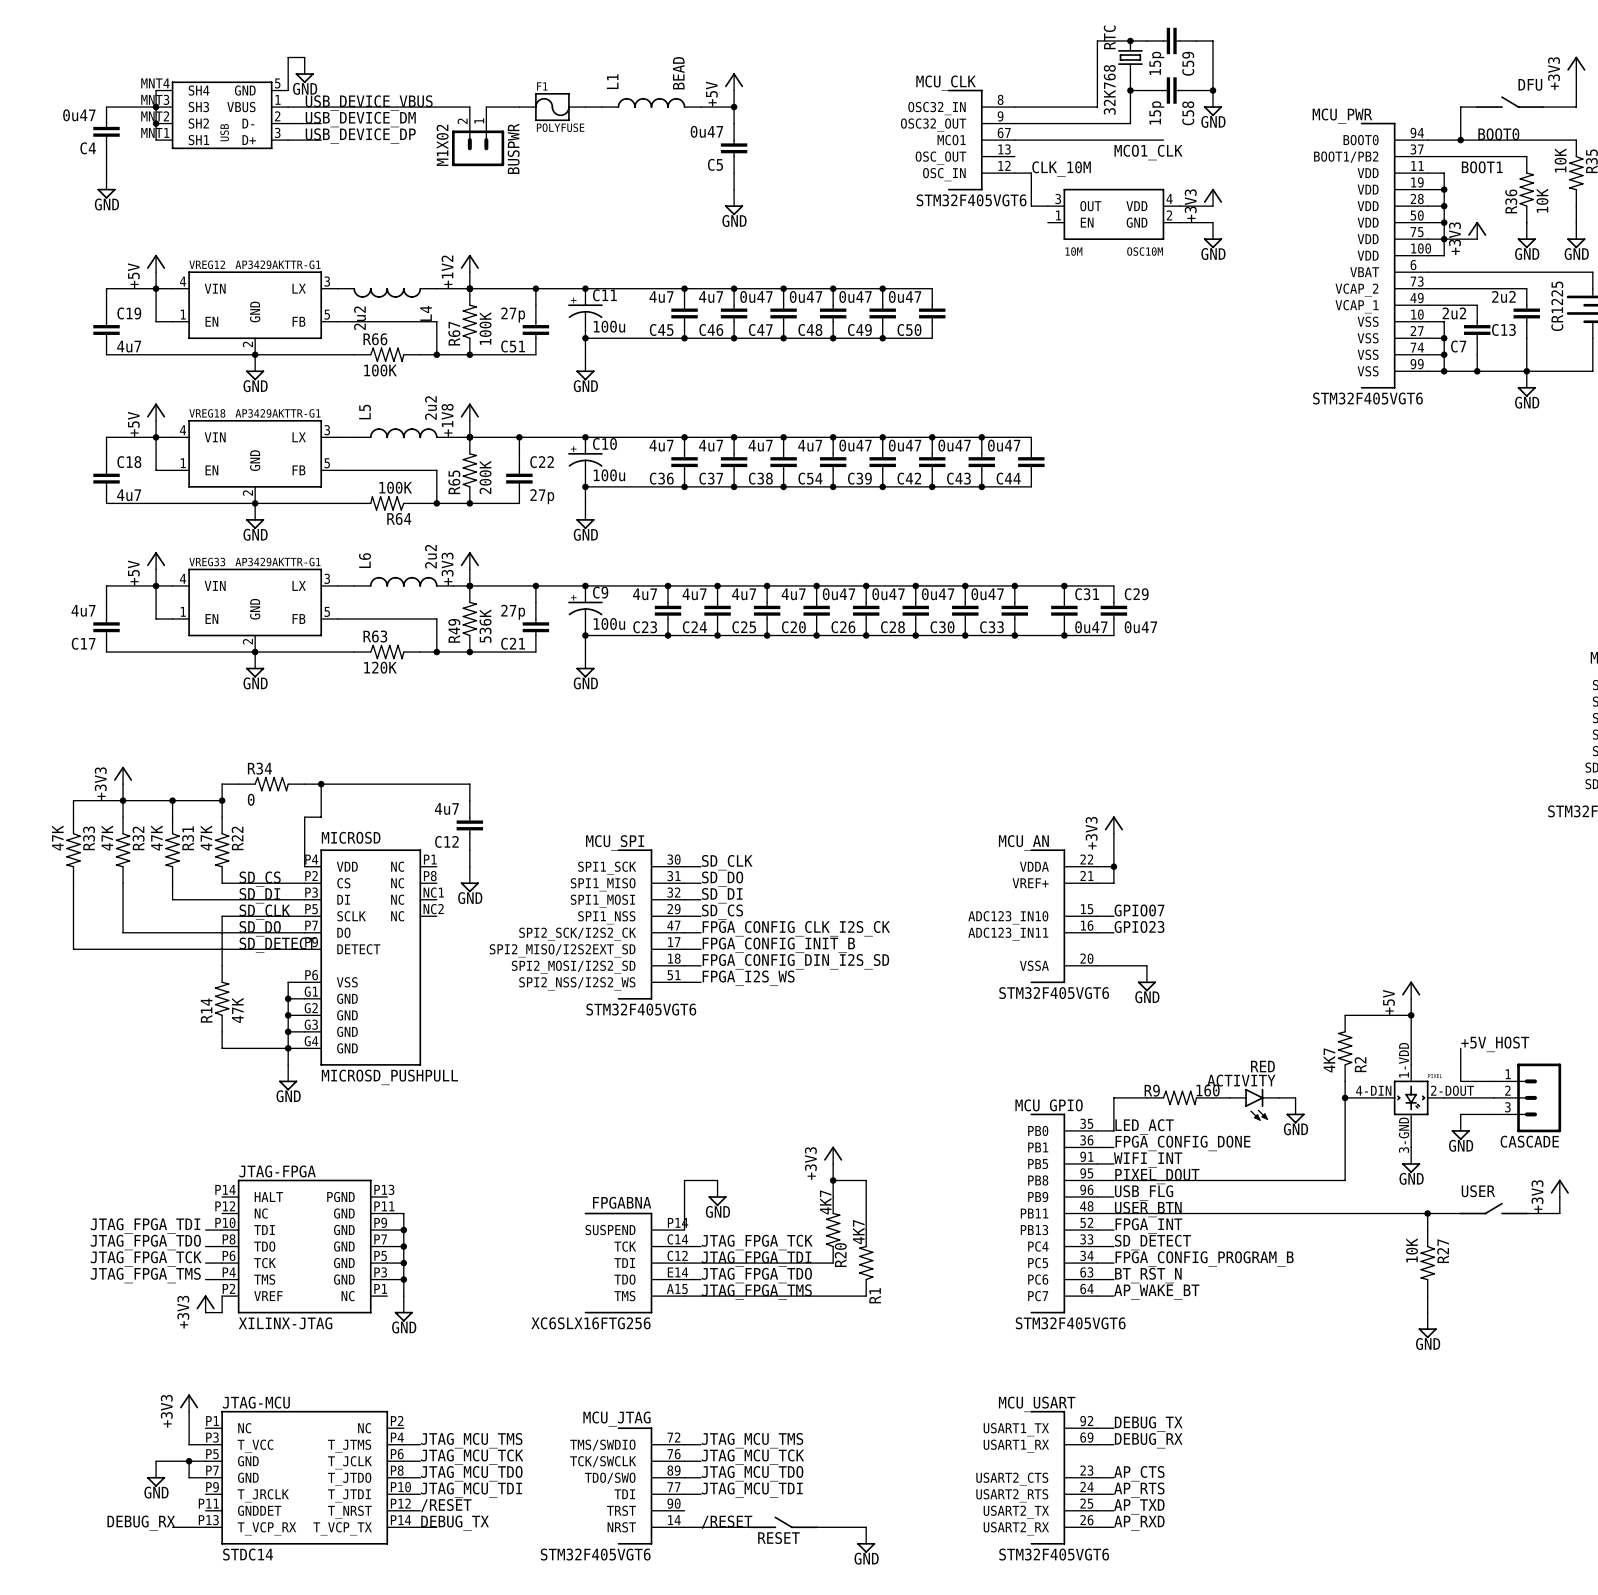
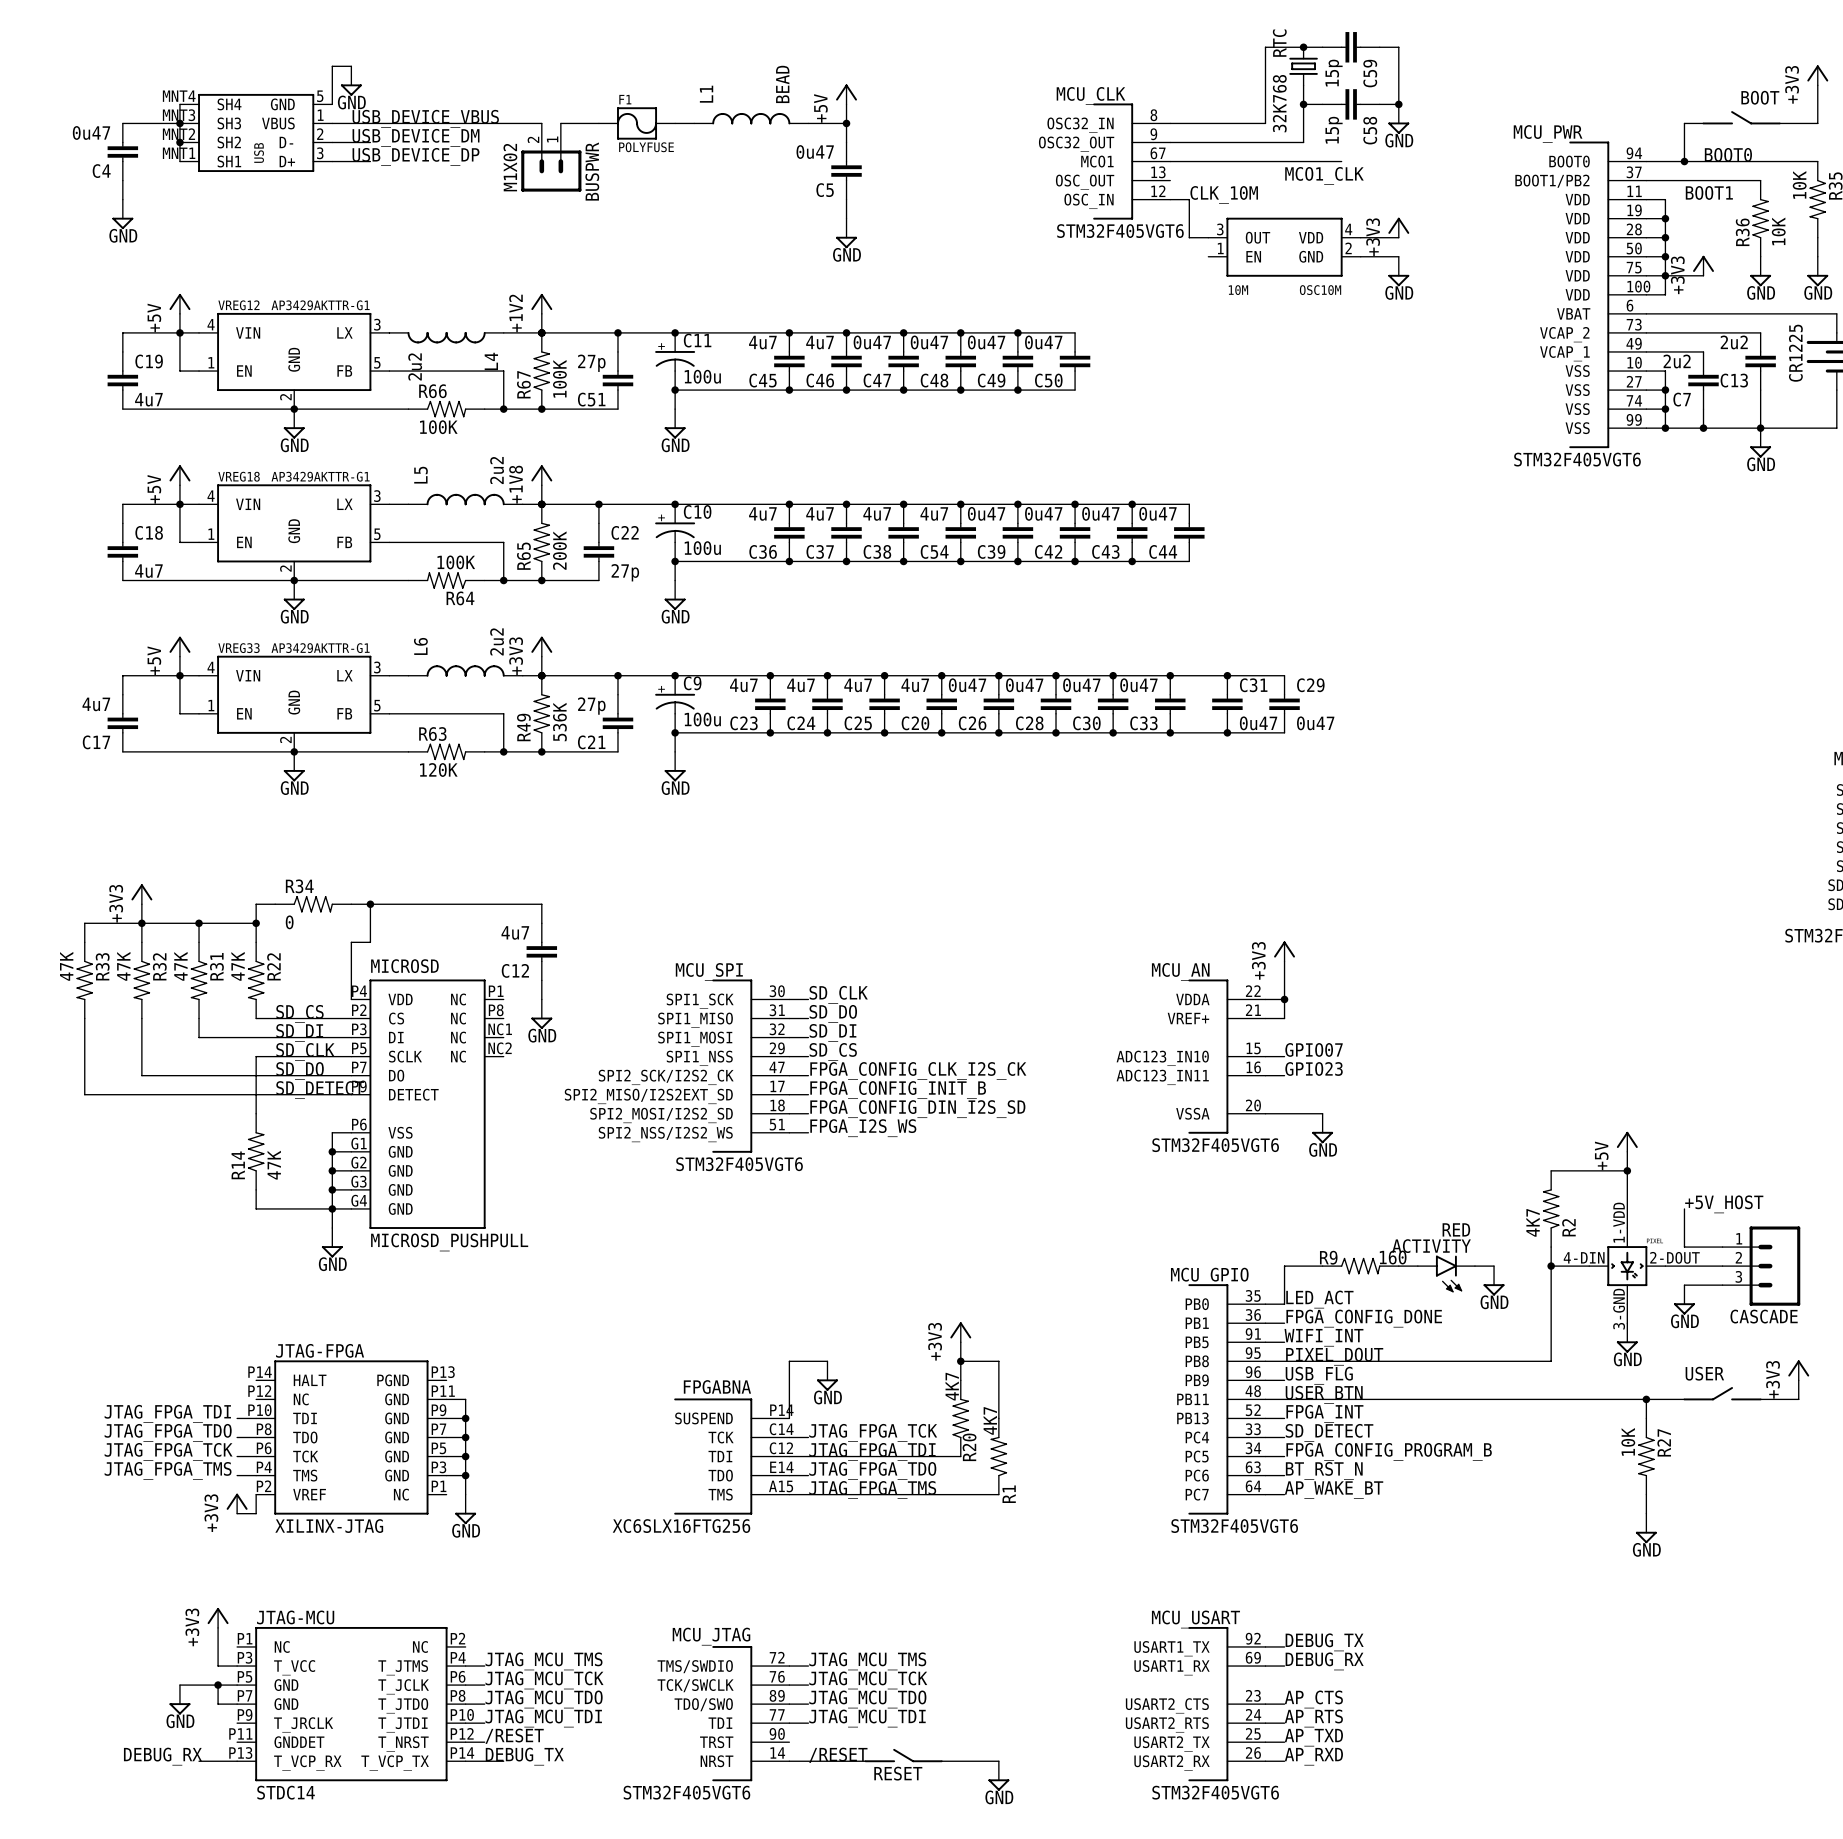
DFU name: DFU (1530, 84) -> BOOT (1760, 97)

